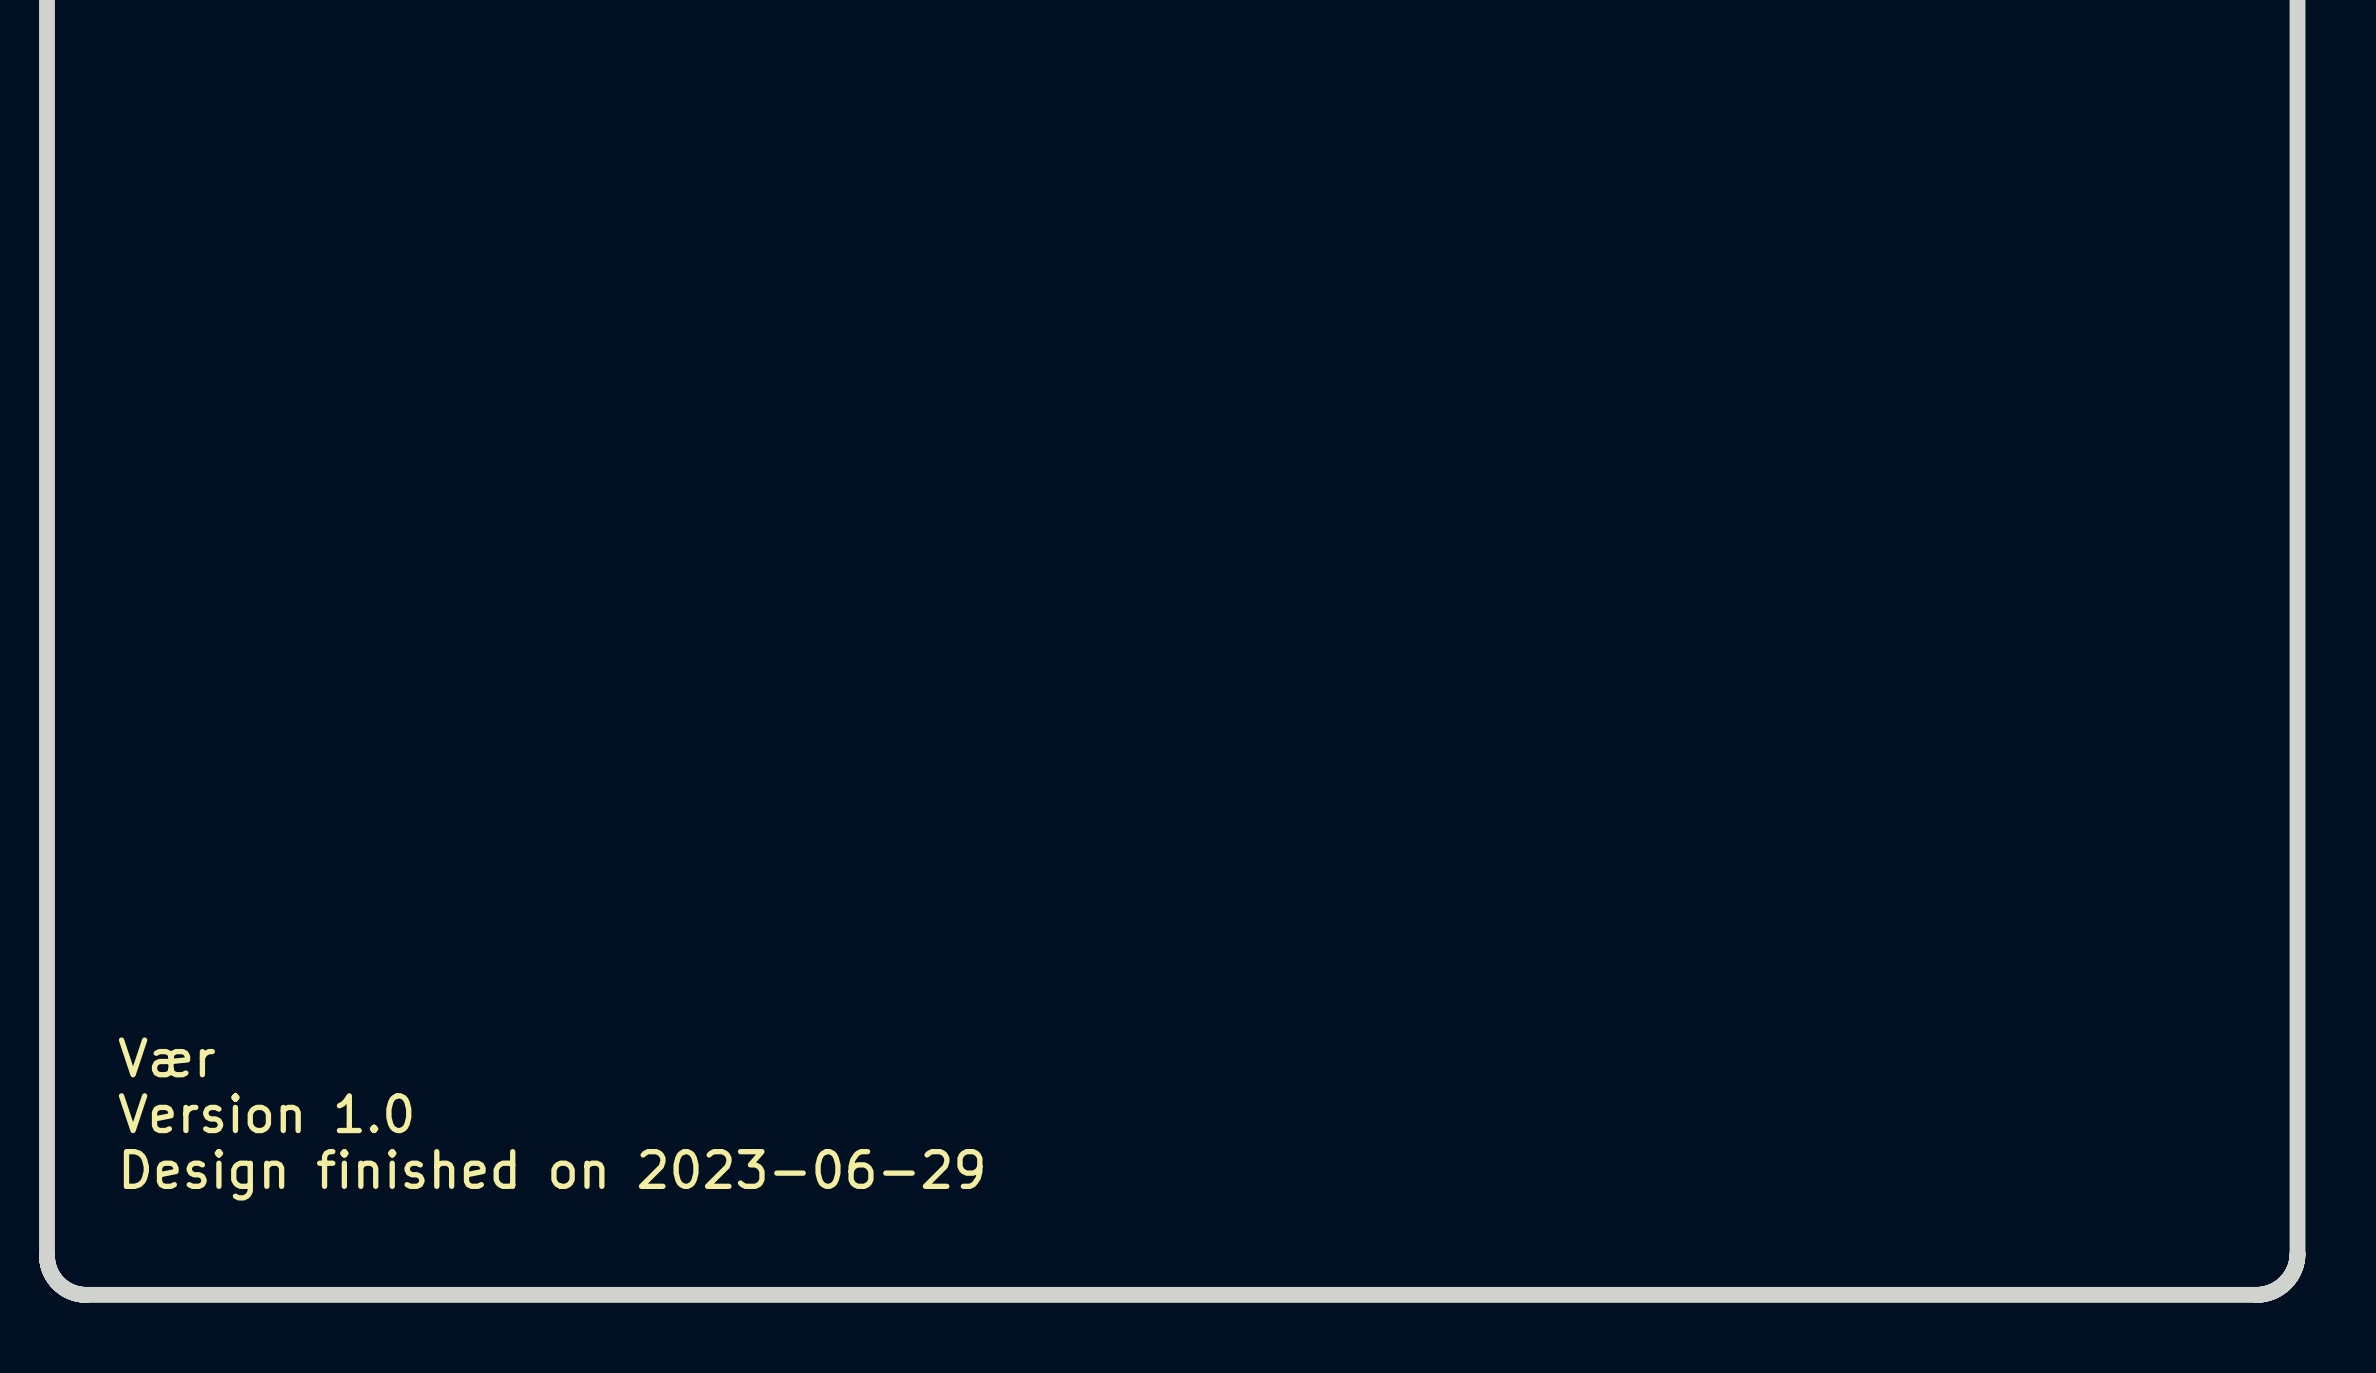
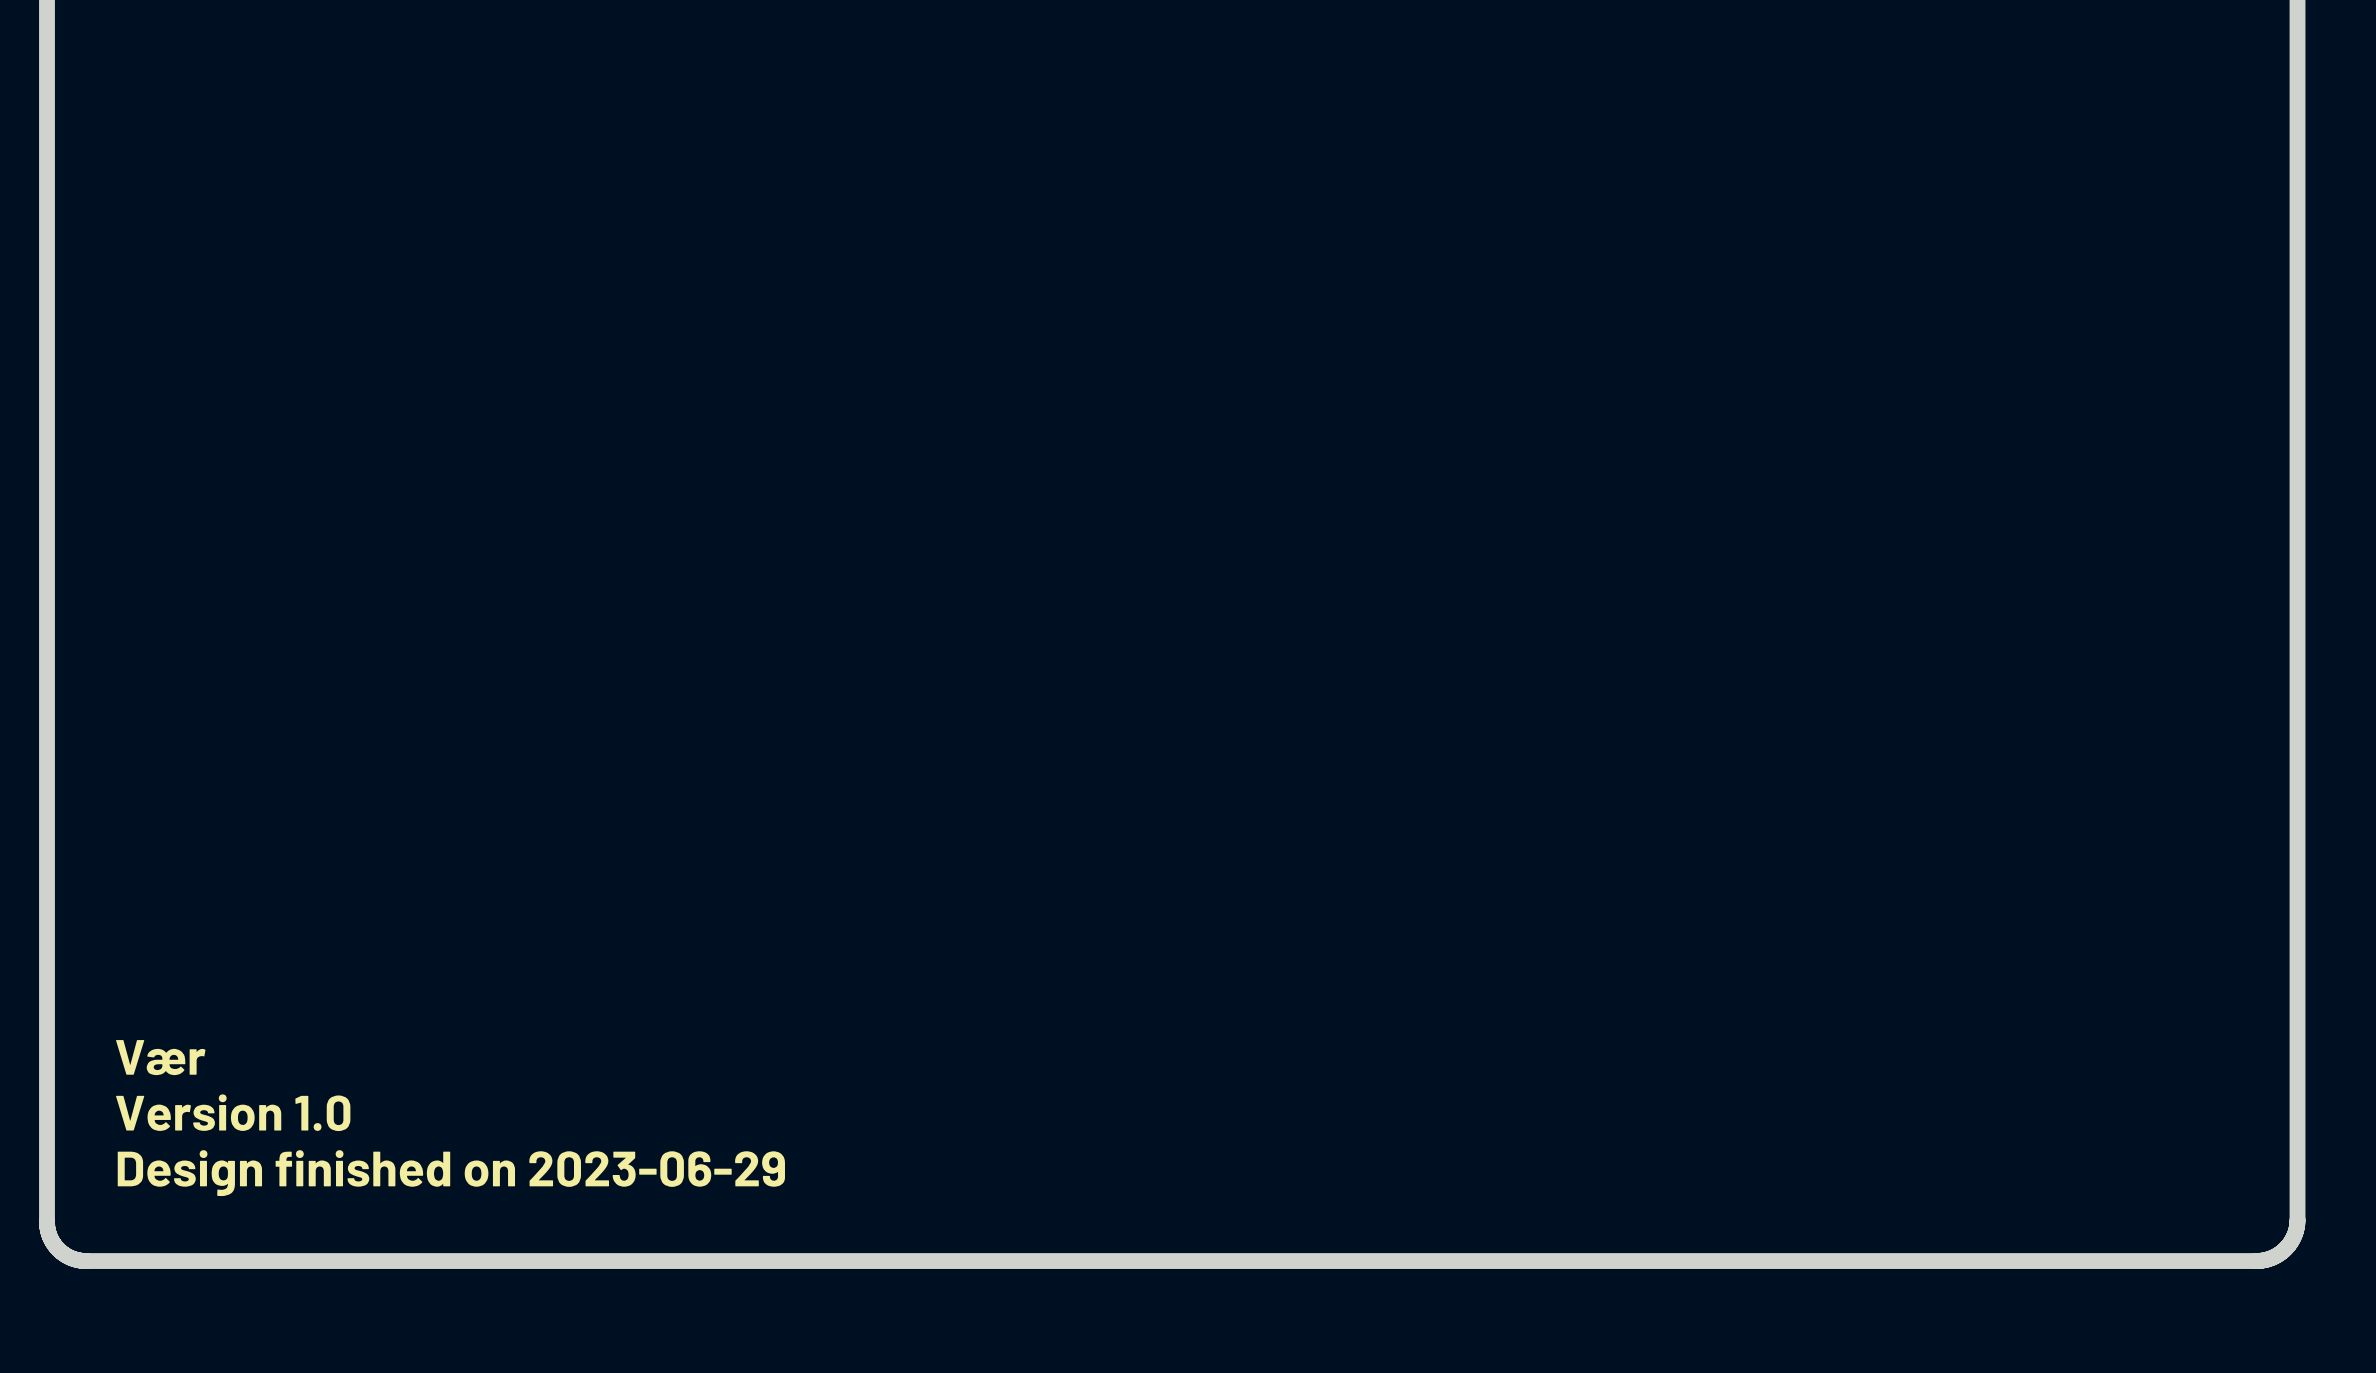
board edge: (2297, 1219) (2297, 1257) (2292, 1273) (2277, 1288) (2266, 1293) (2256, 1294) (84, 1294) (64, 1288) (50, 1272) (47, 1259) (46, 1221) -> (2297, 1219) (2294, 1235) (2285, 1248) (2272, 1257) (2256, 1261) (86, 1261) (70, 1257) (58, 1249) (50, 1237) (46, 1221)

